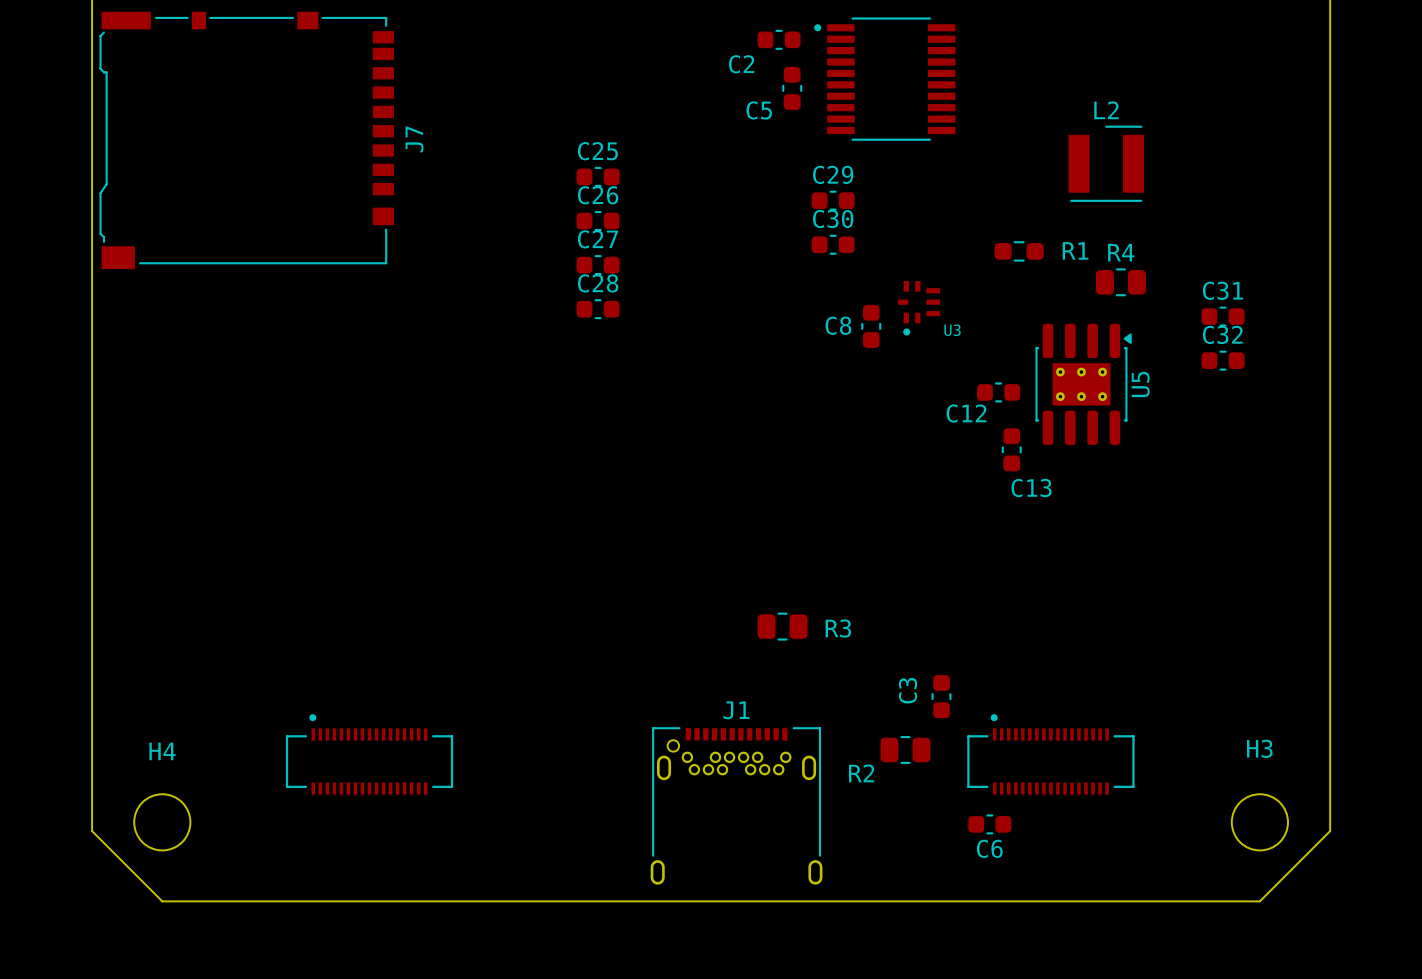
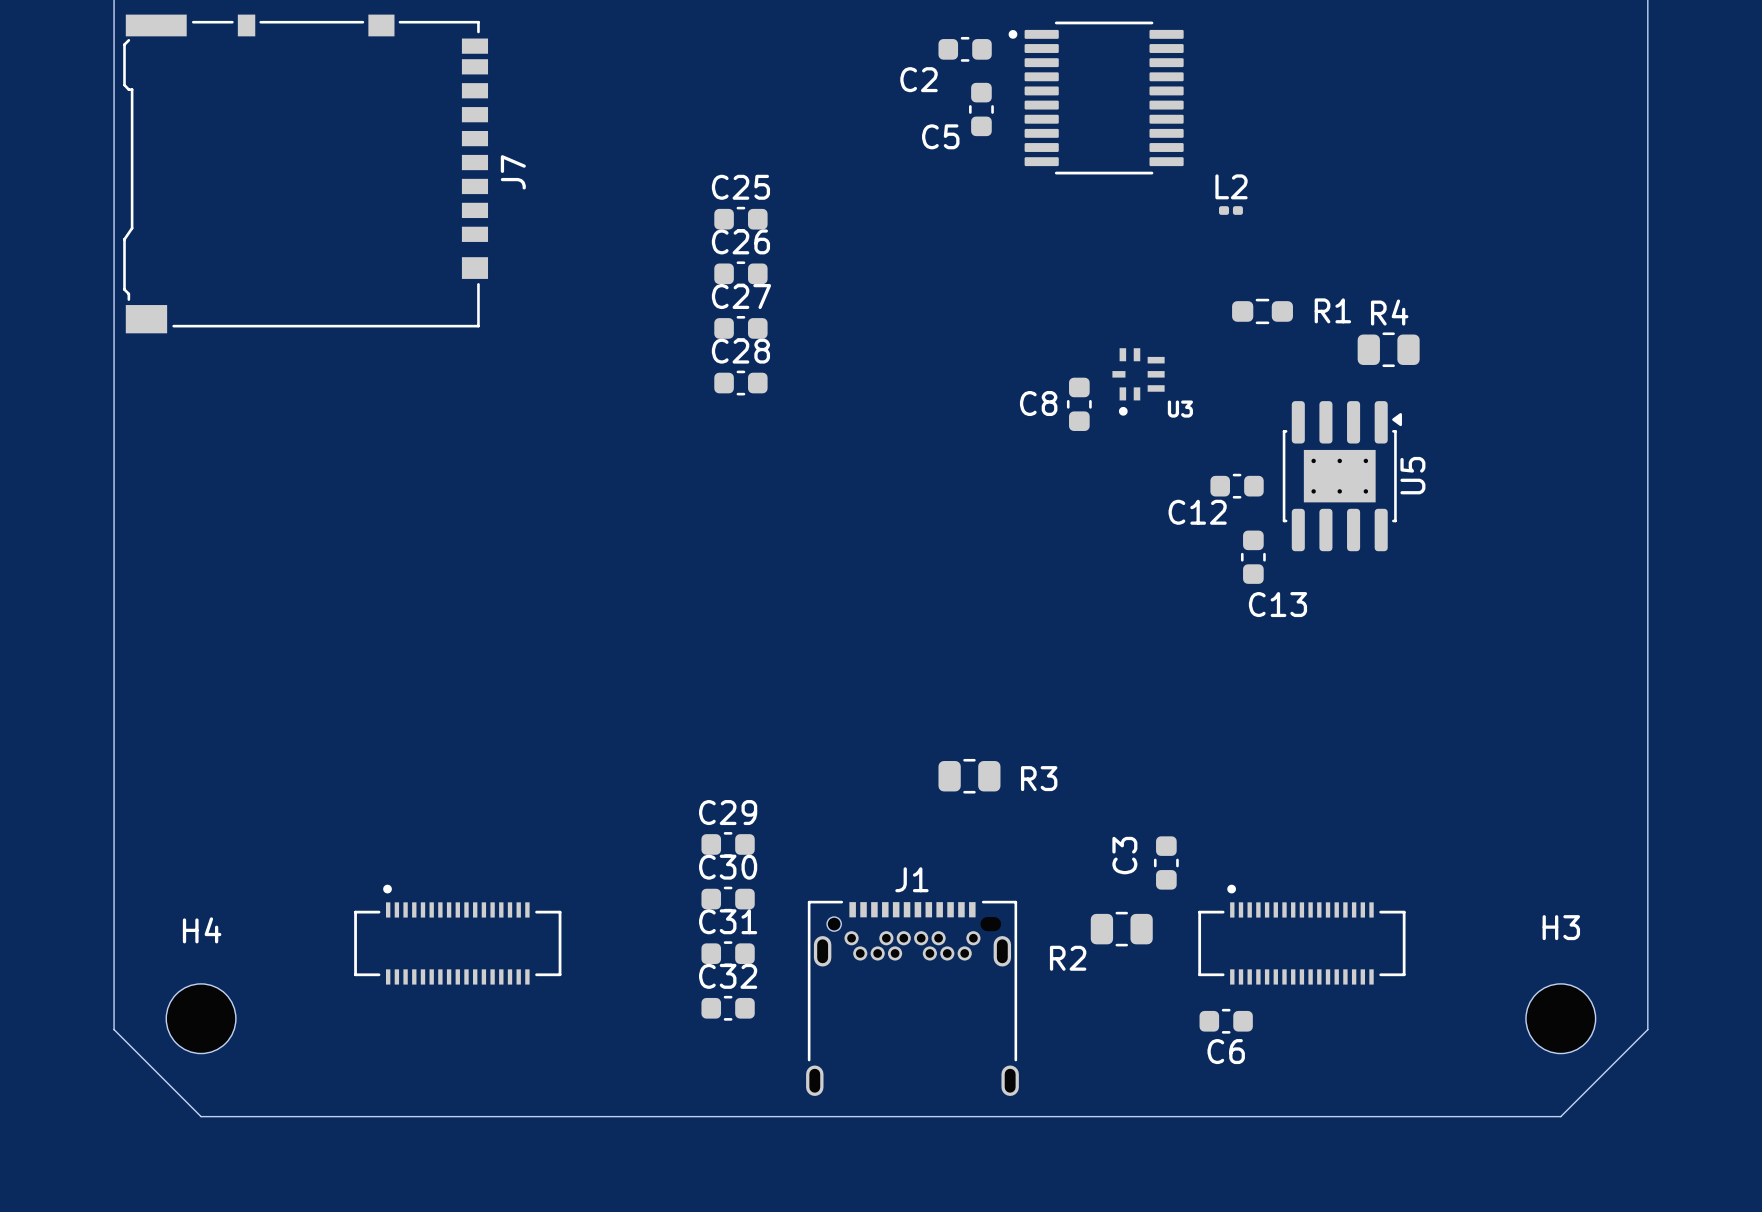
L2 footprint: [1068, 125, 1144, 202] -> [1219, 206, 1243, 215]
C29 position: (833, 200) -> (728, 844)
C30 position: (833, 244) -> (728, 899)
C31 position: (1223, 316) -> (728, 953)
C32 position: (1223, 360) -> (728, 1008)

